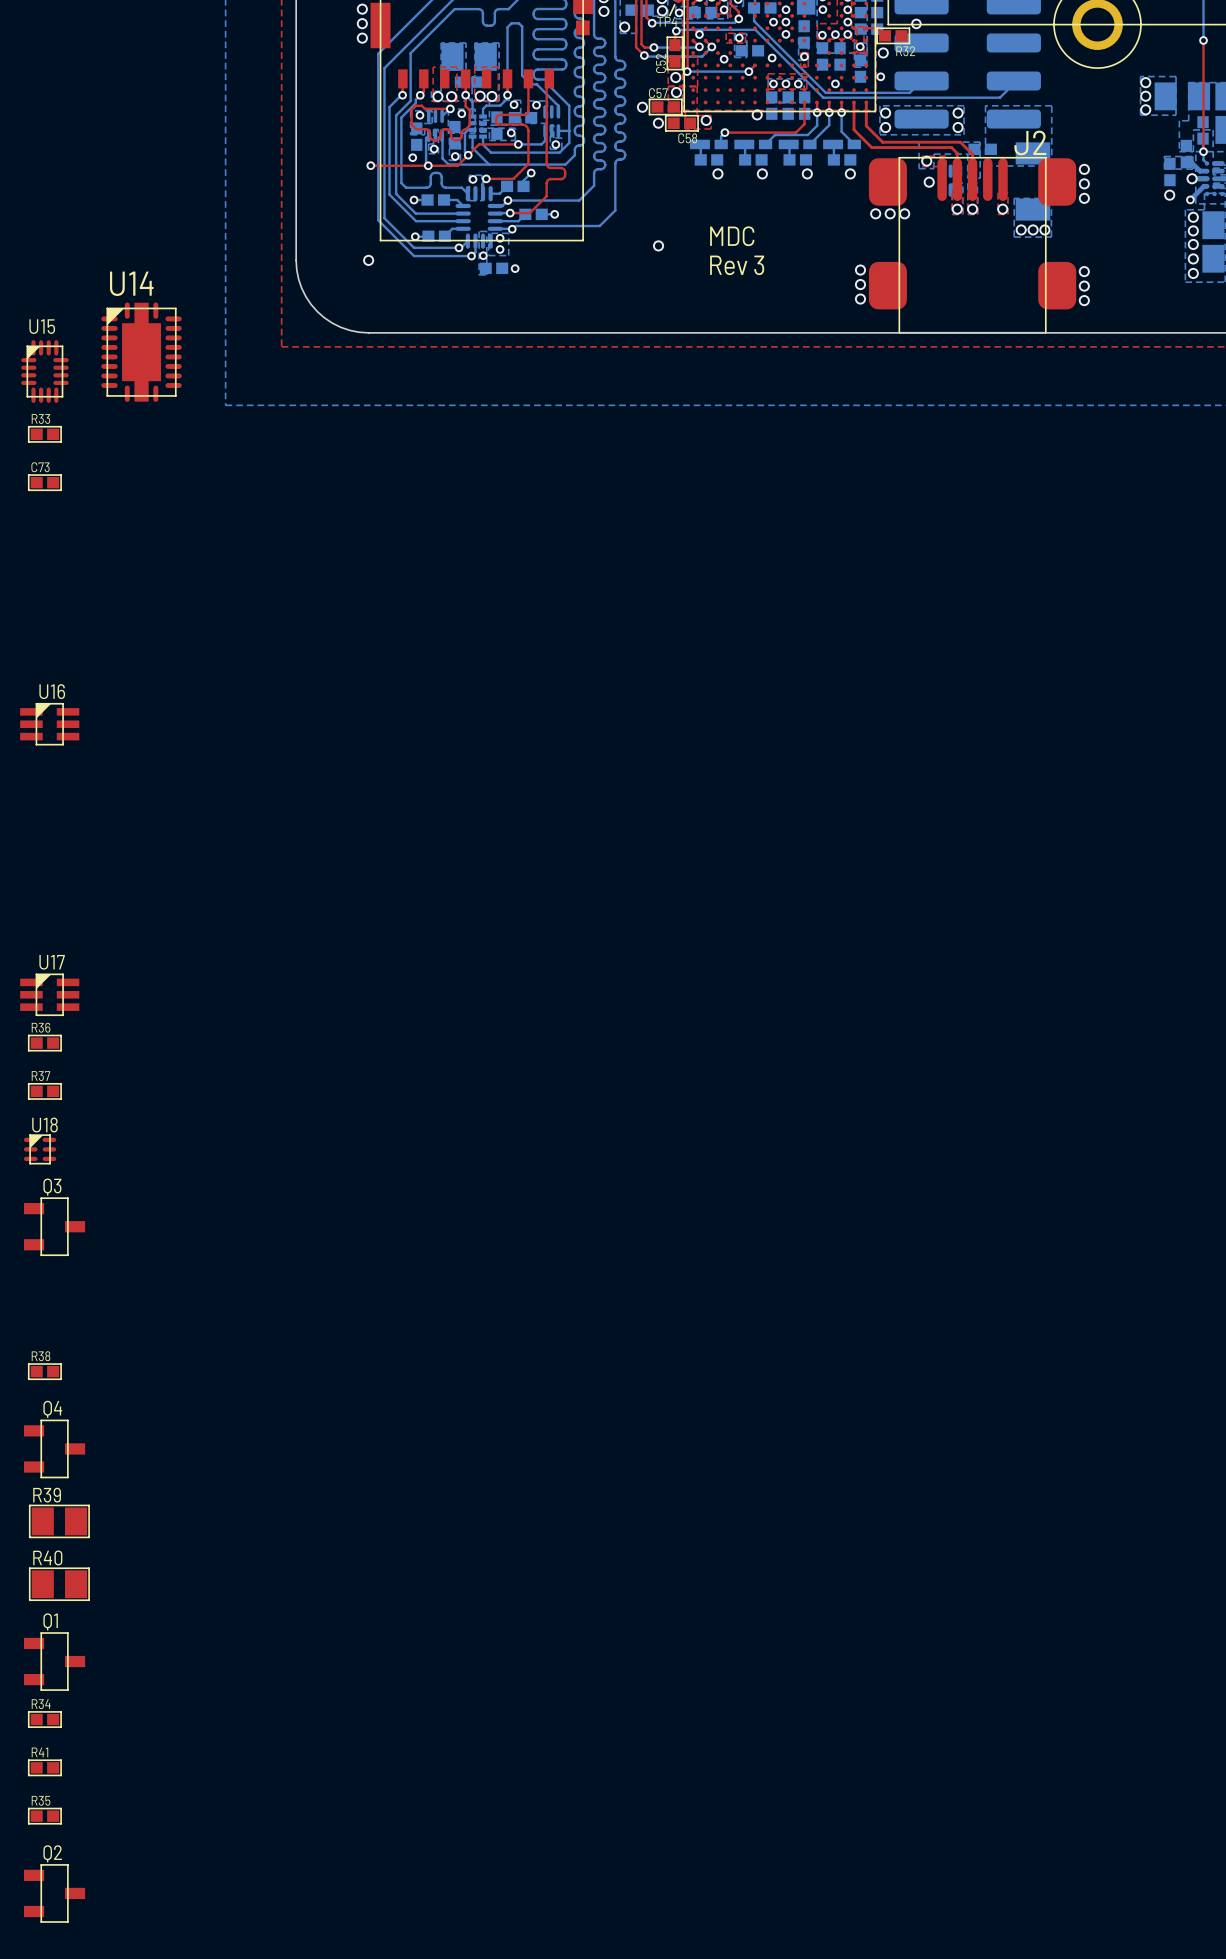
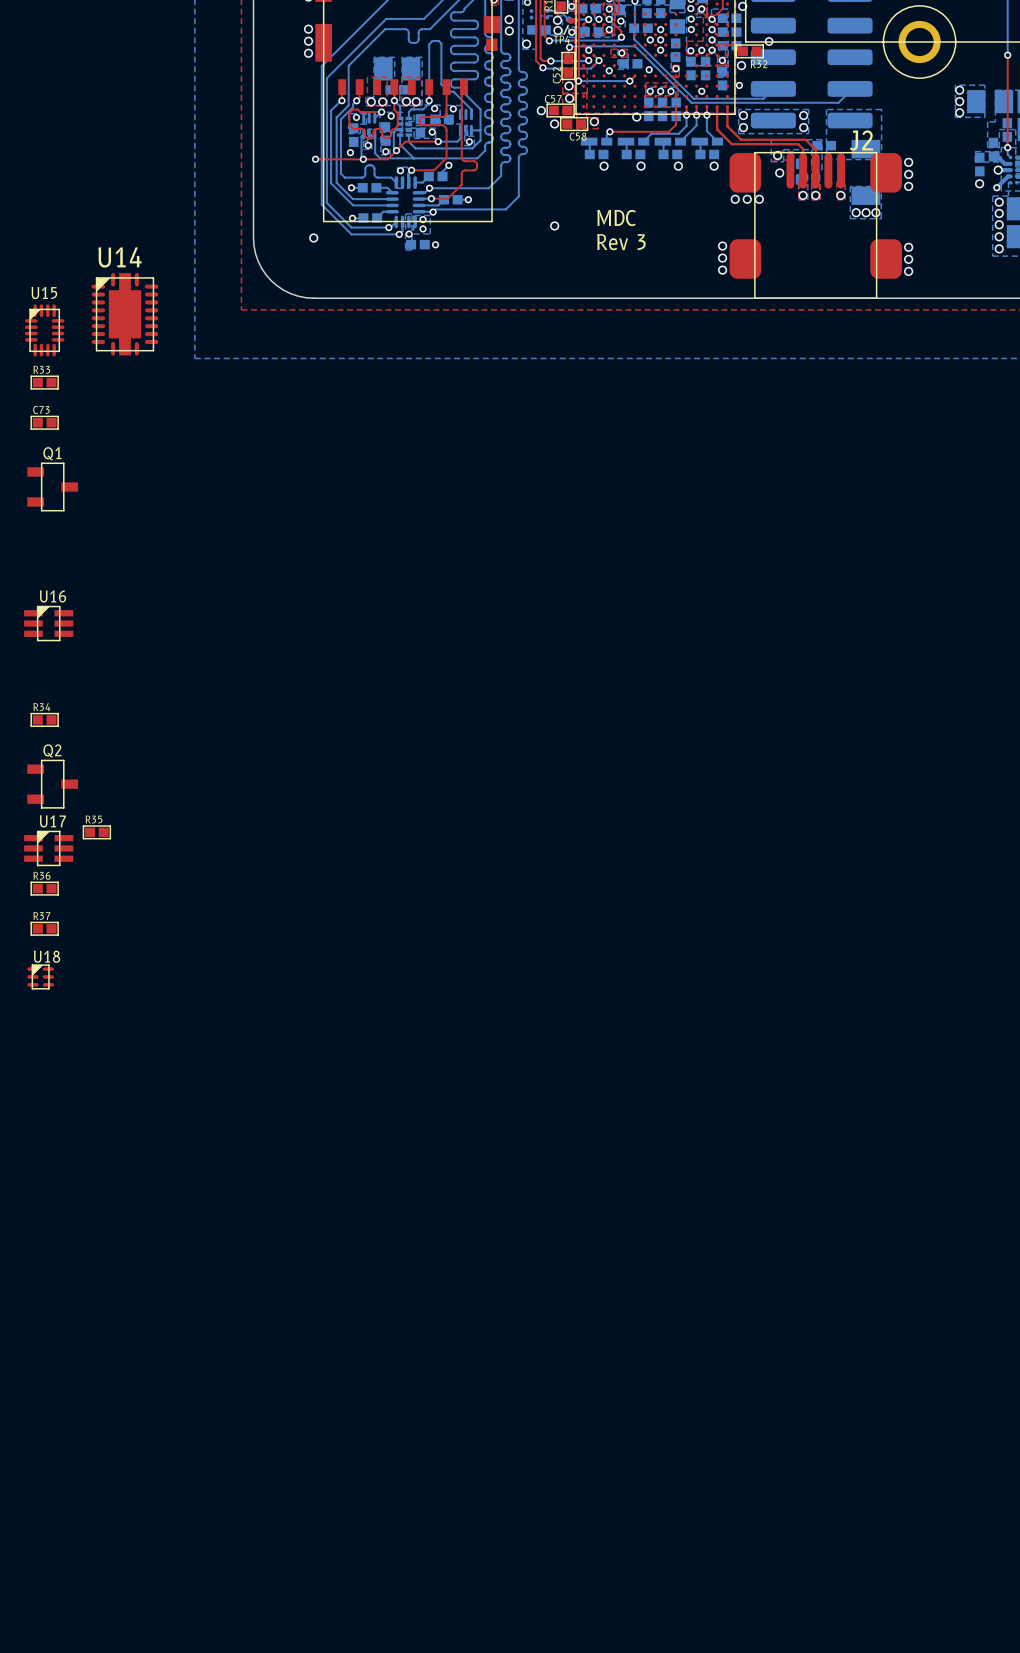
Q3: (54, 1226) -> none
R38: (44, 1371) -> none
Q4: (54, 1448) -> none
R39: (59, 1521) -> none
R40: (59, 1584) -> none
Q1 position: (54, 1661) -> (52, 486)
R34 position: (44, 1719) -> (44, 719)
R41: (44, 1767) -> none
R35 position: (44, 1816) -> (96, 832)
Q2 position: (54, 1893) -> (52, 784)

